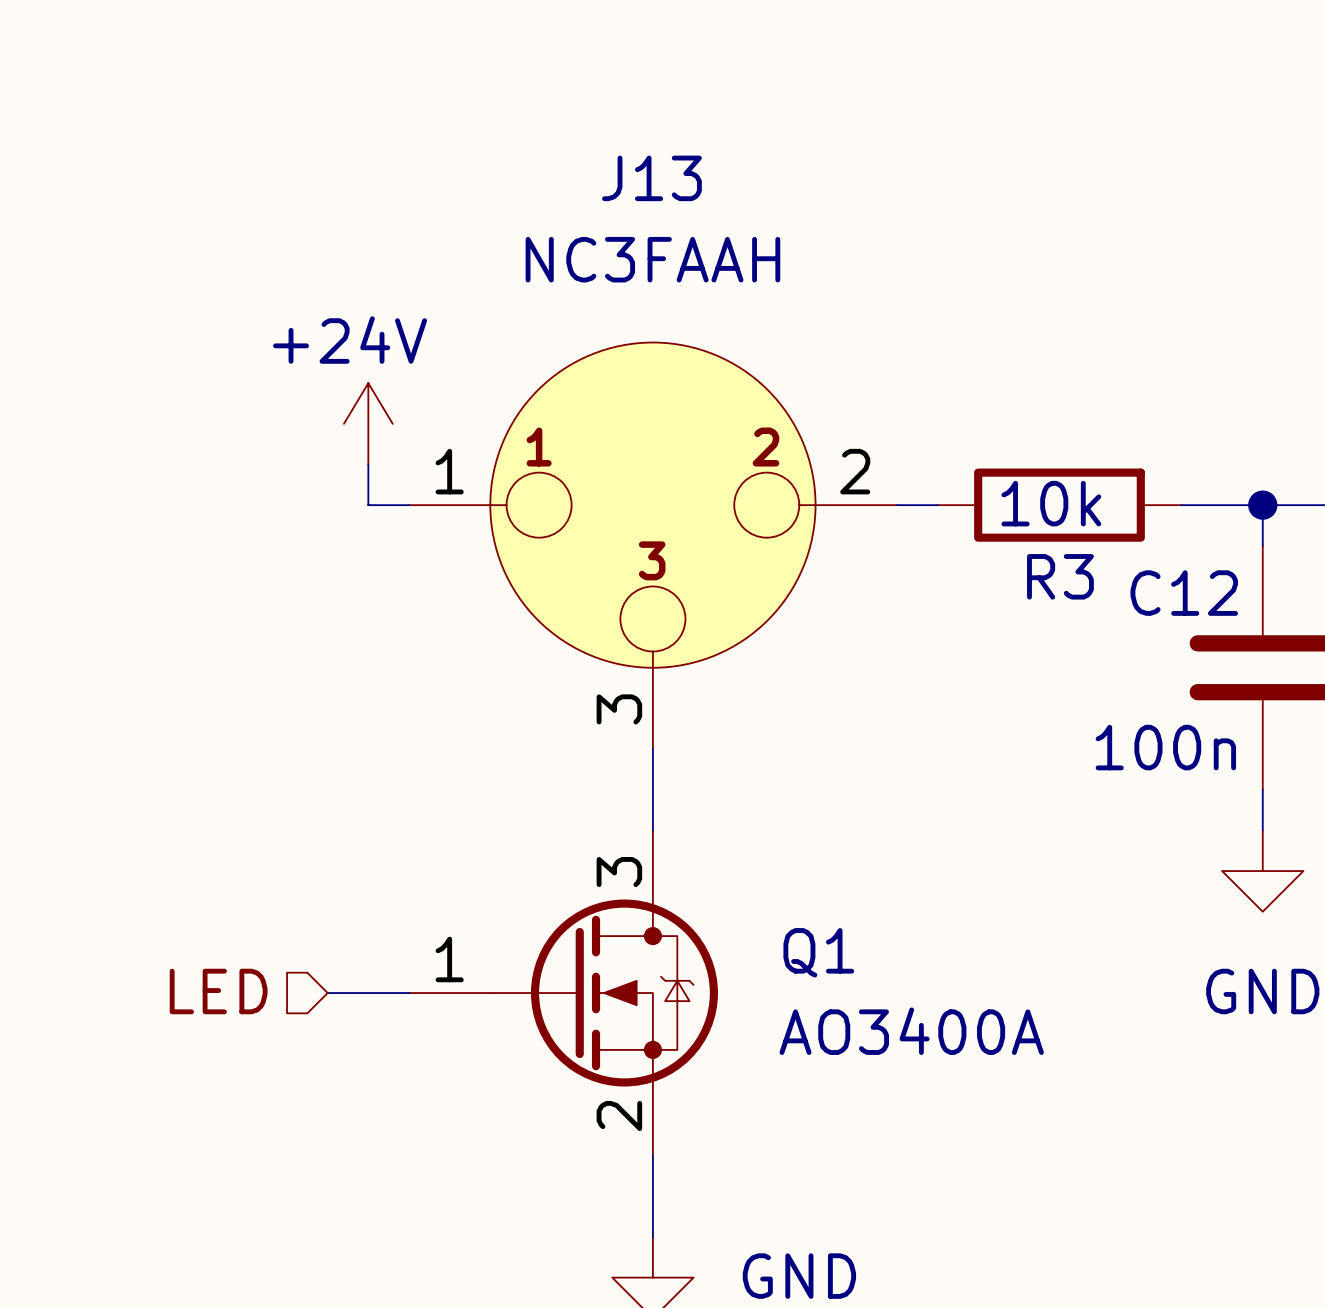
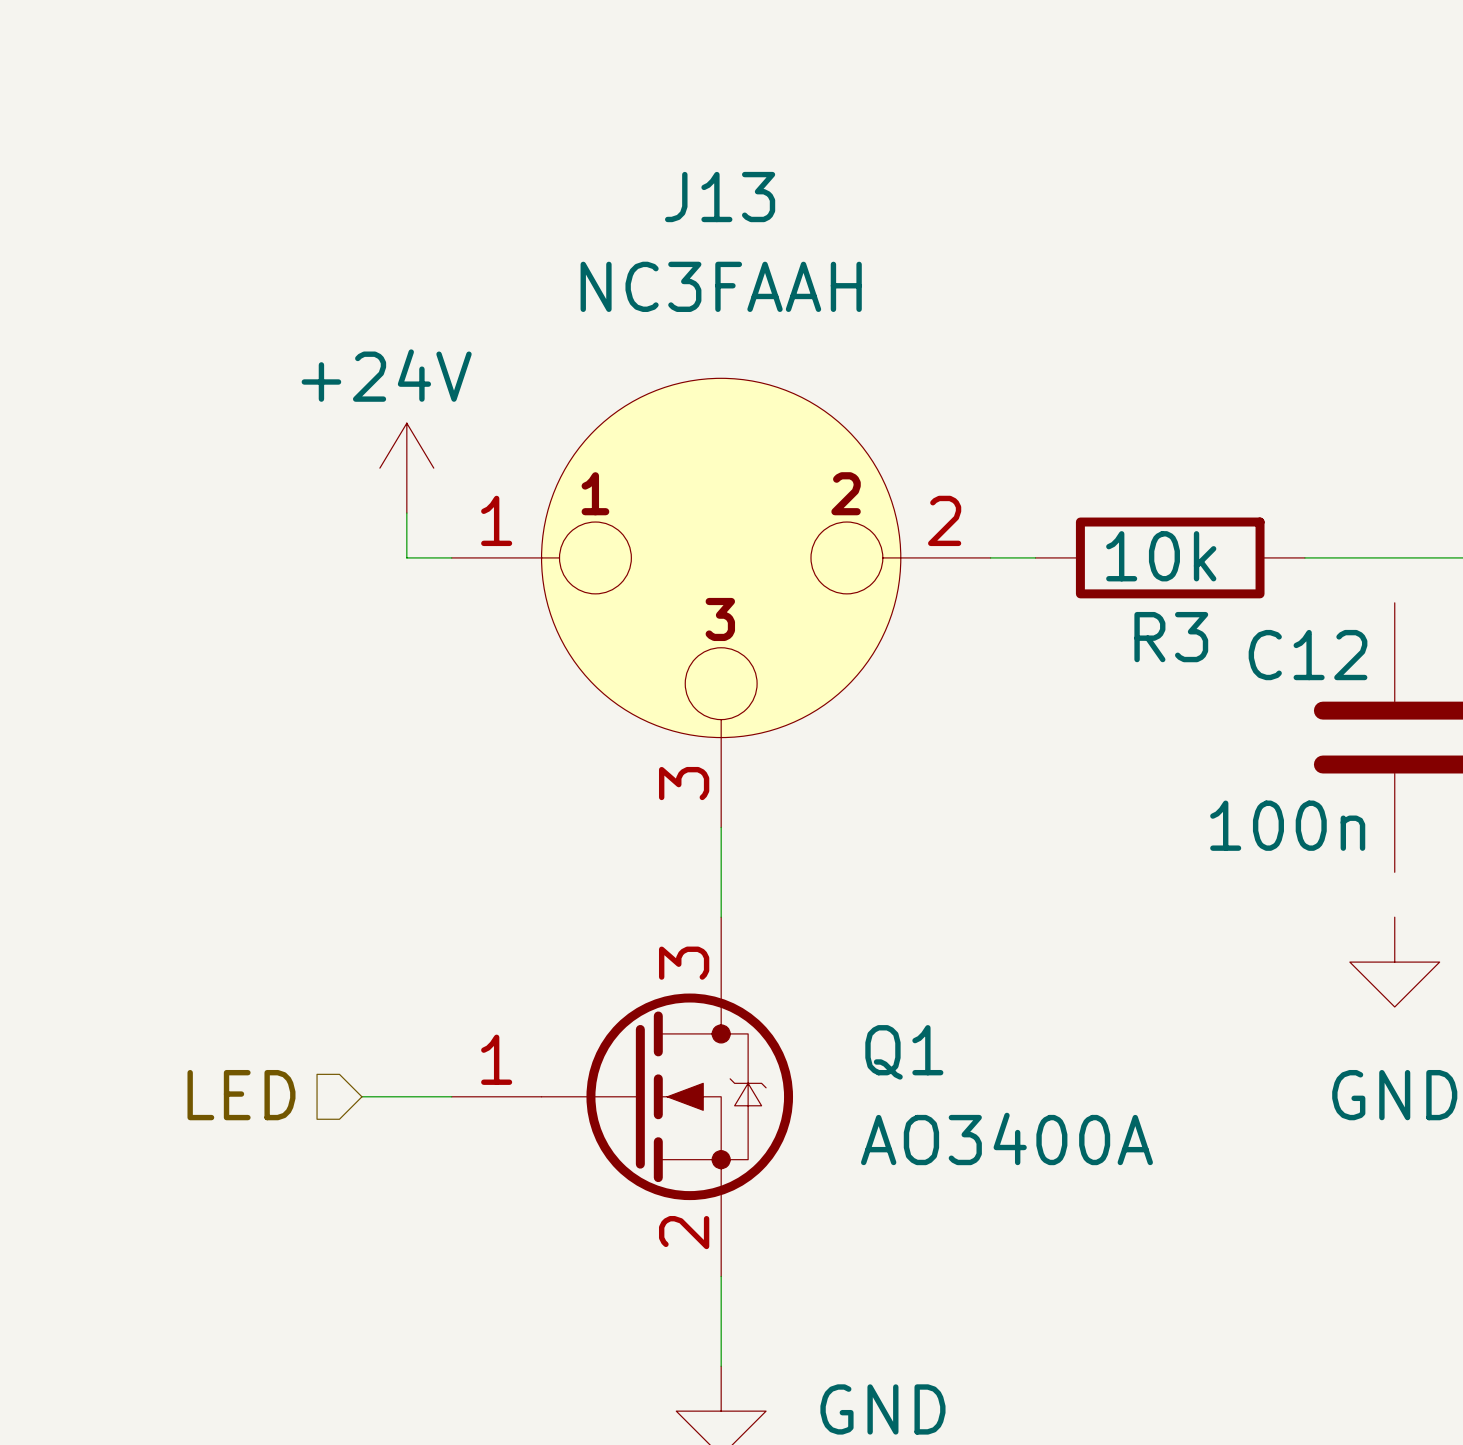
wire: (1262, 505) (1262, 545) -> none
junction: (1262, 505) -> none
wire: (1262, 789) (1262, 830) -> none

